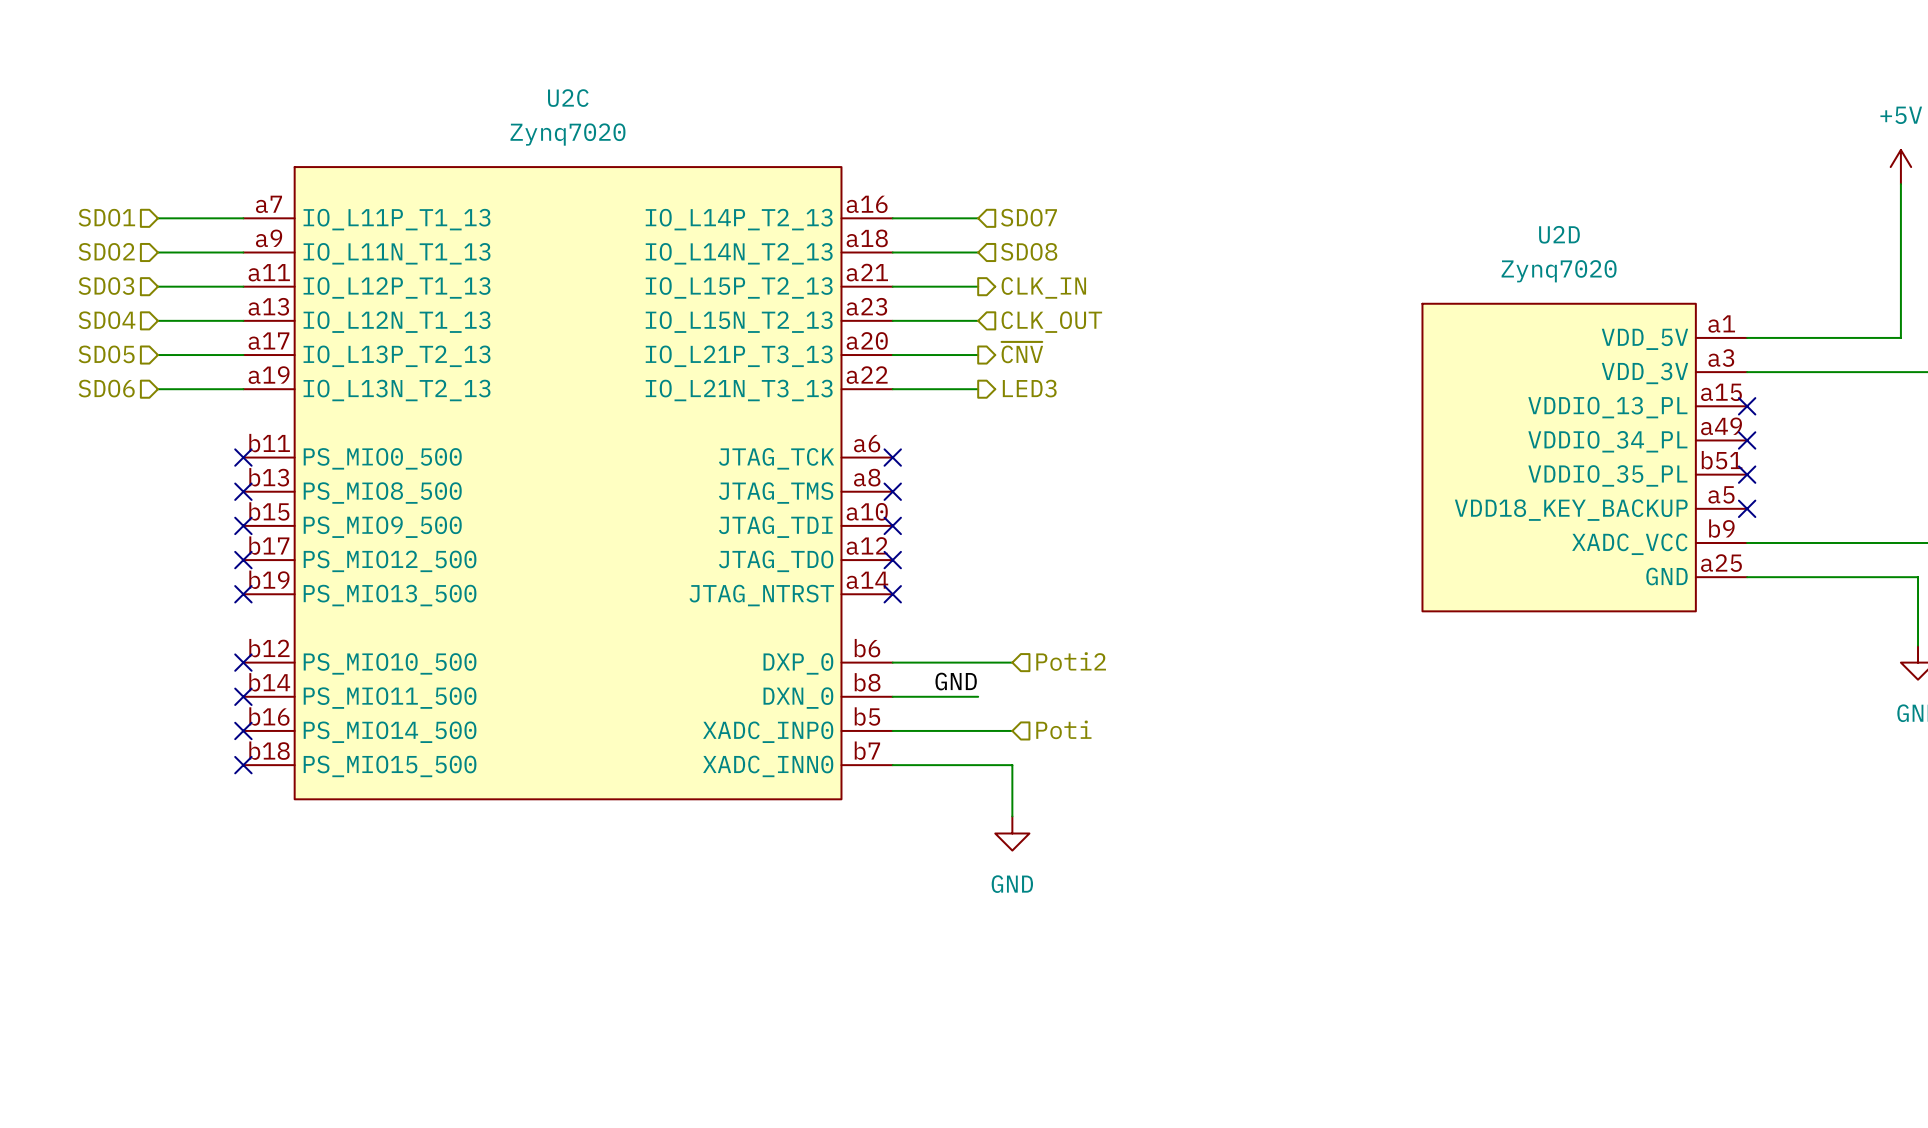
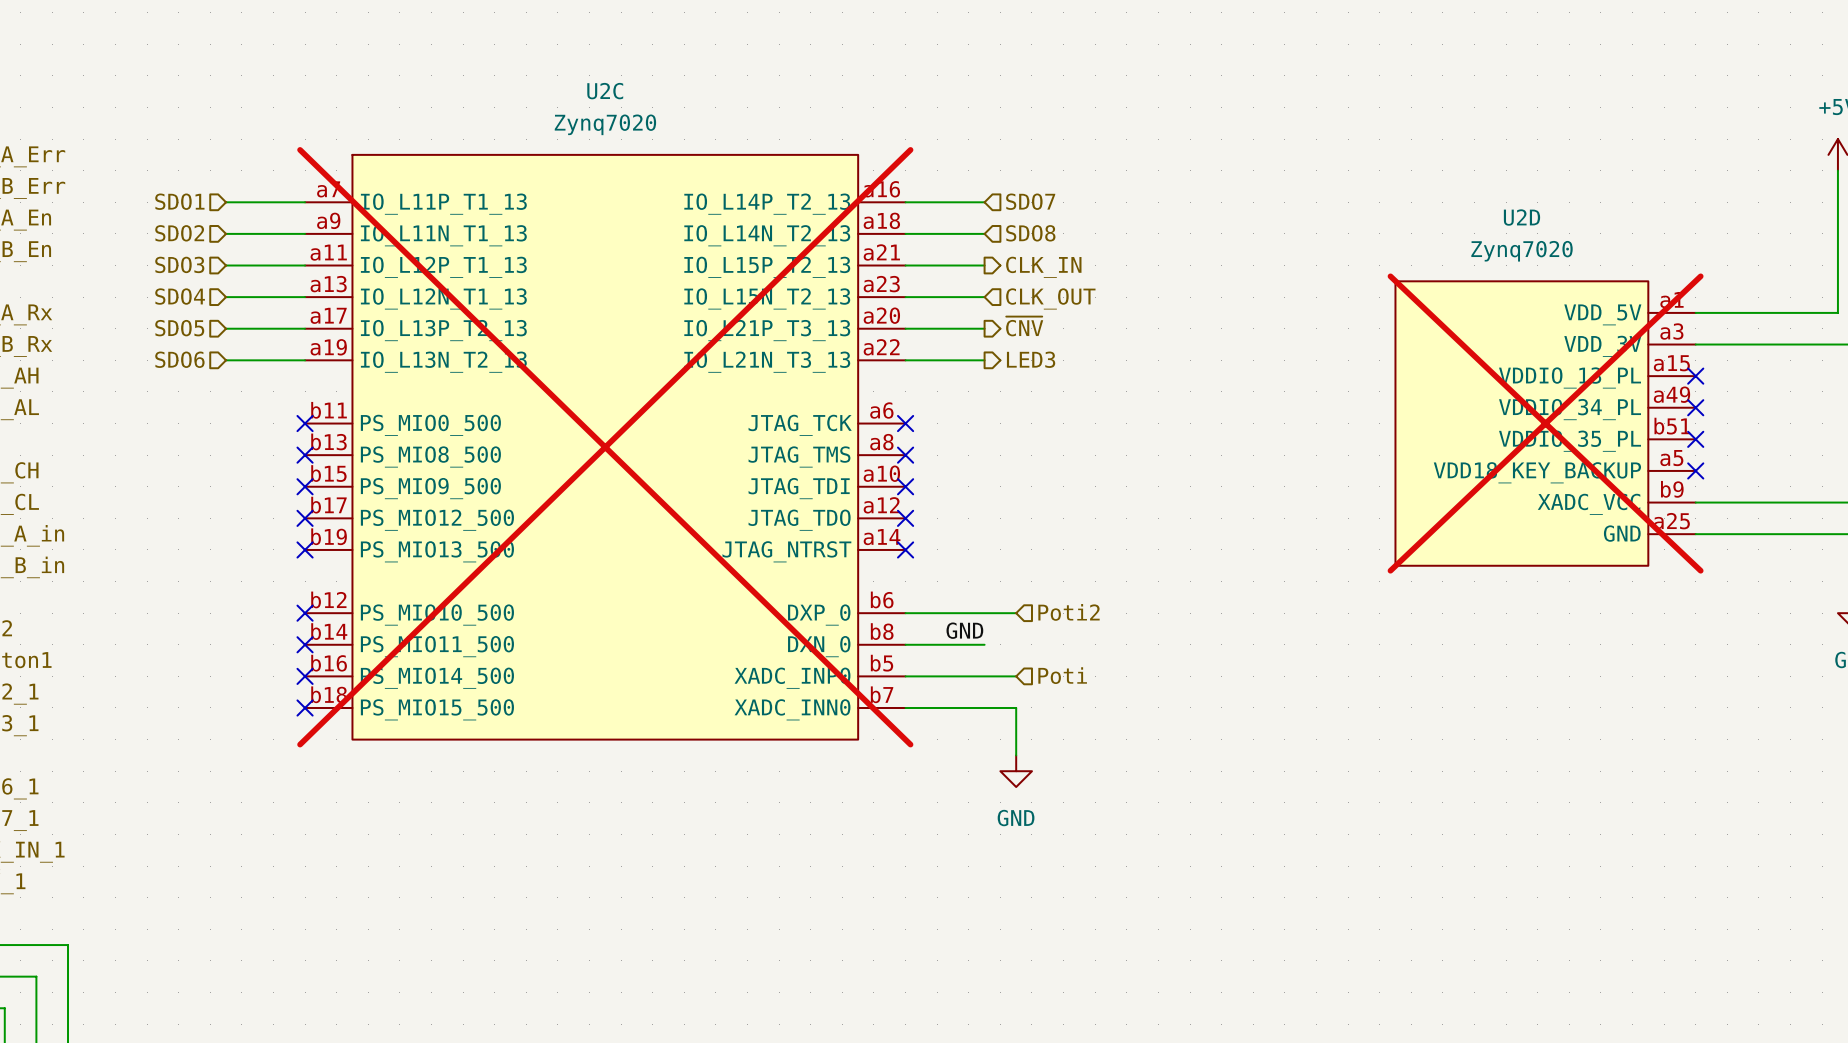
U2D do-not-place cross: none -> (1545, 423)
U2C do-not-place cross: none -> (605, 447)

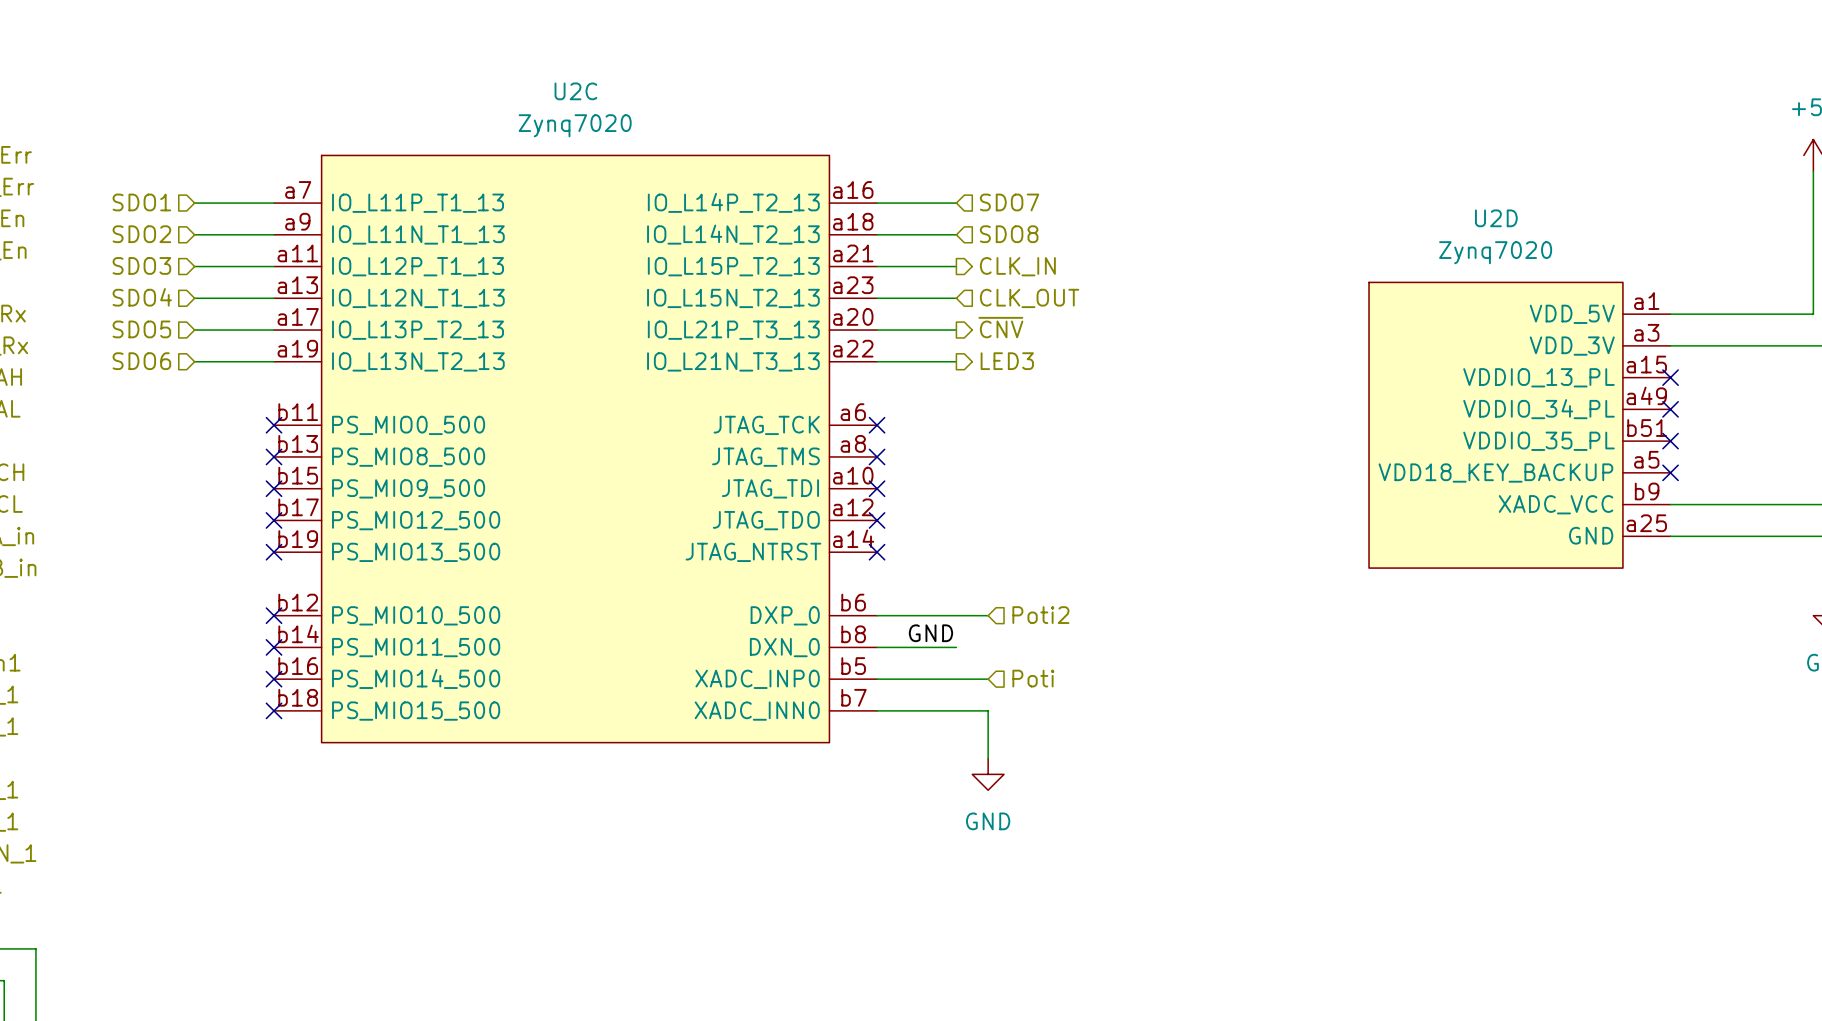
U2D do-not-place cross: (1545, 423) -> none
U2C do-not-place cross: (605, 447) -> none

